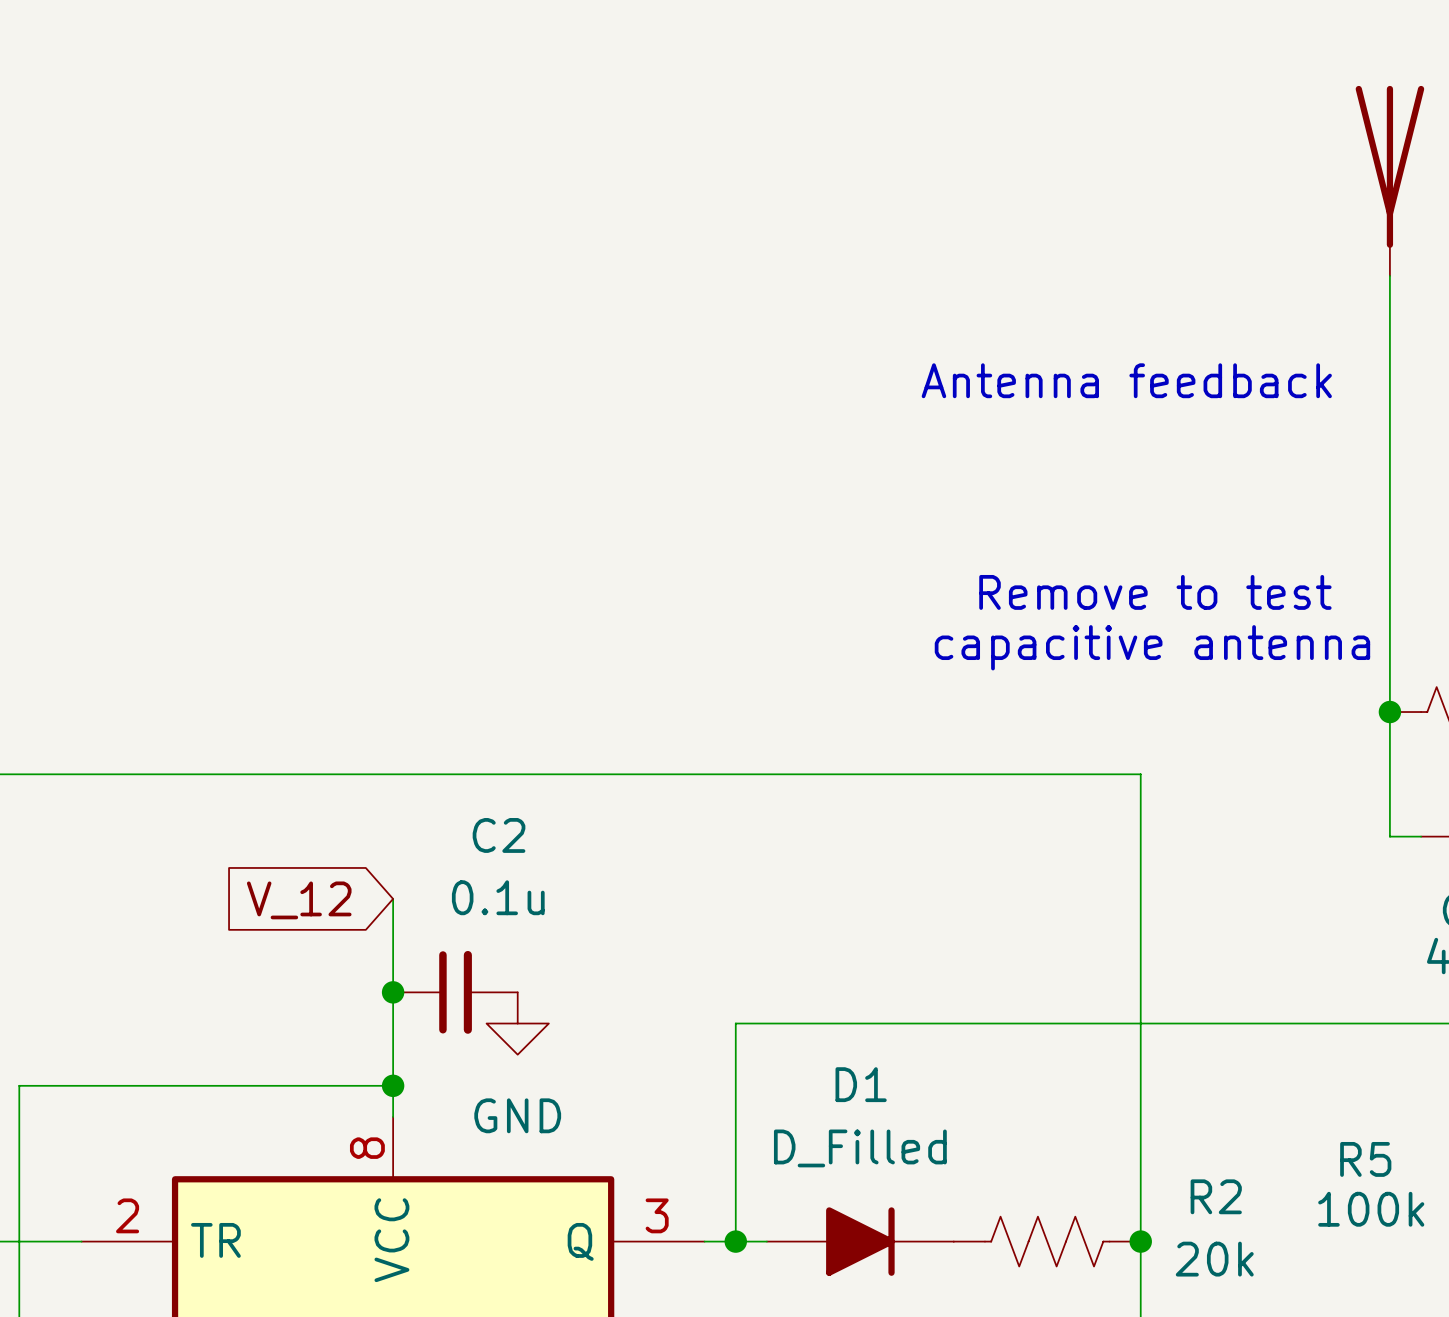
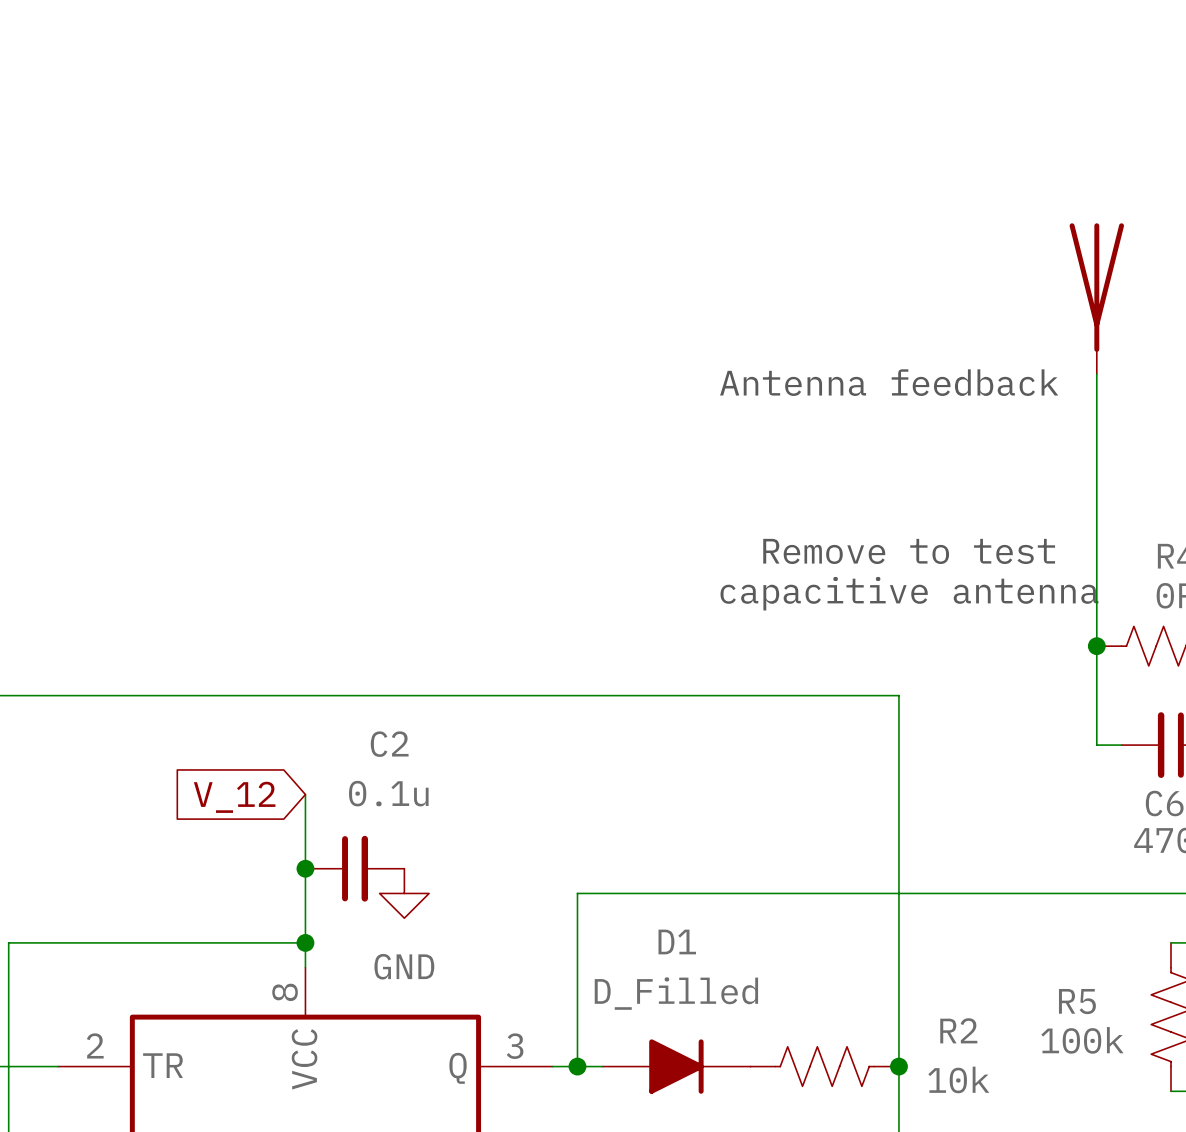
part position: (1389, 180) -> (1096, 298)
R2 value: 20k (1214, 1259) -> 10k (958, 1079)

